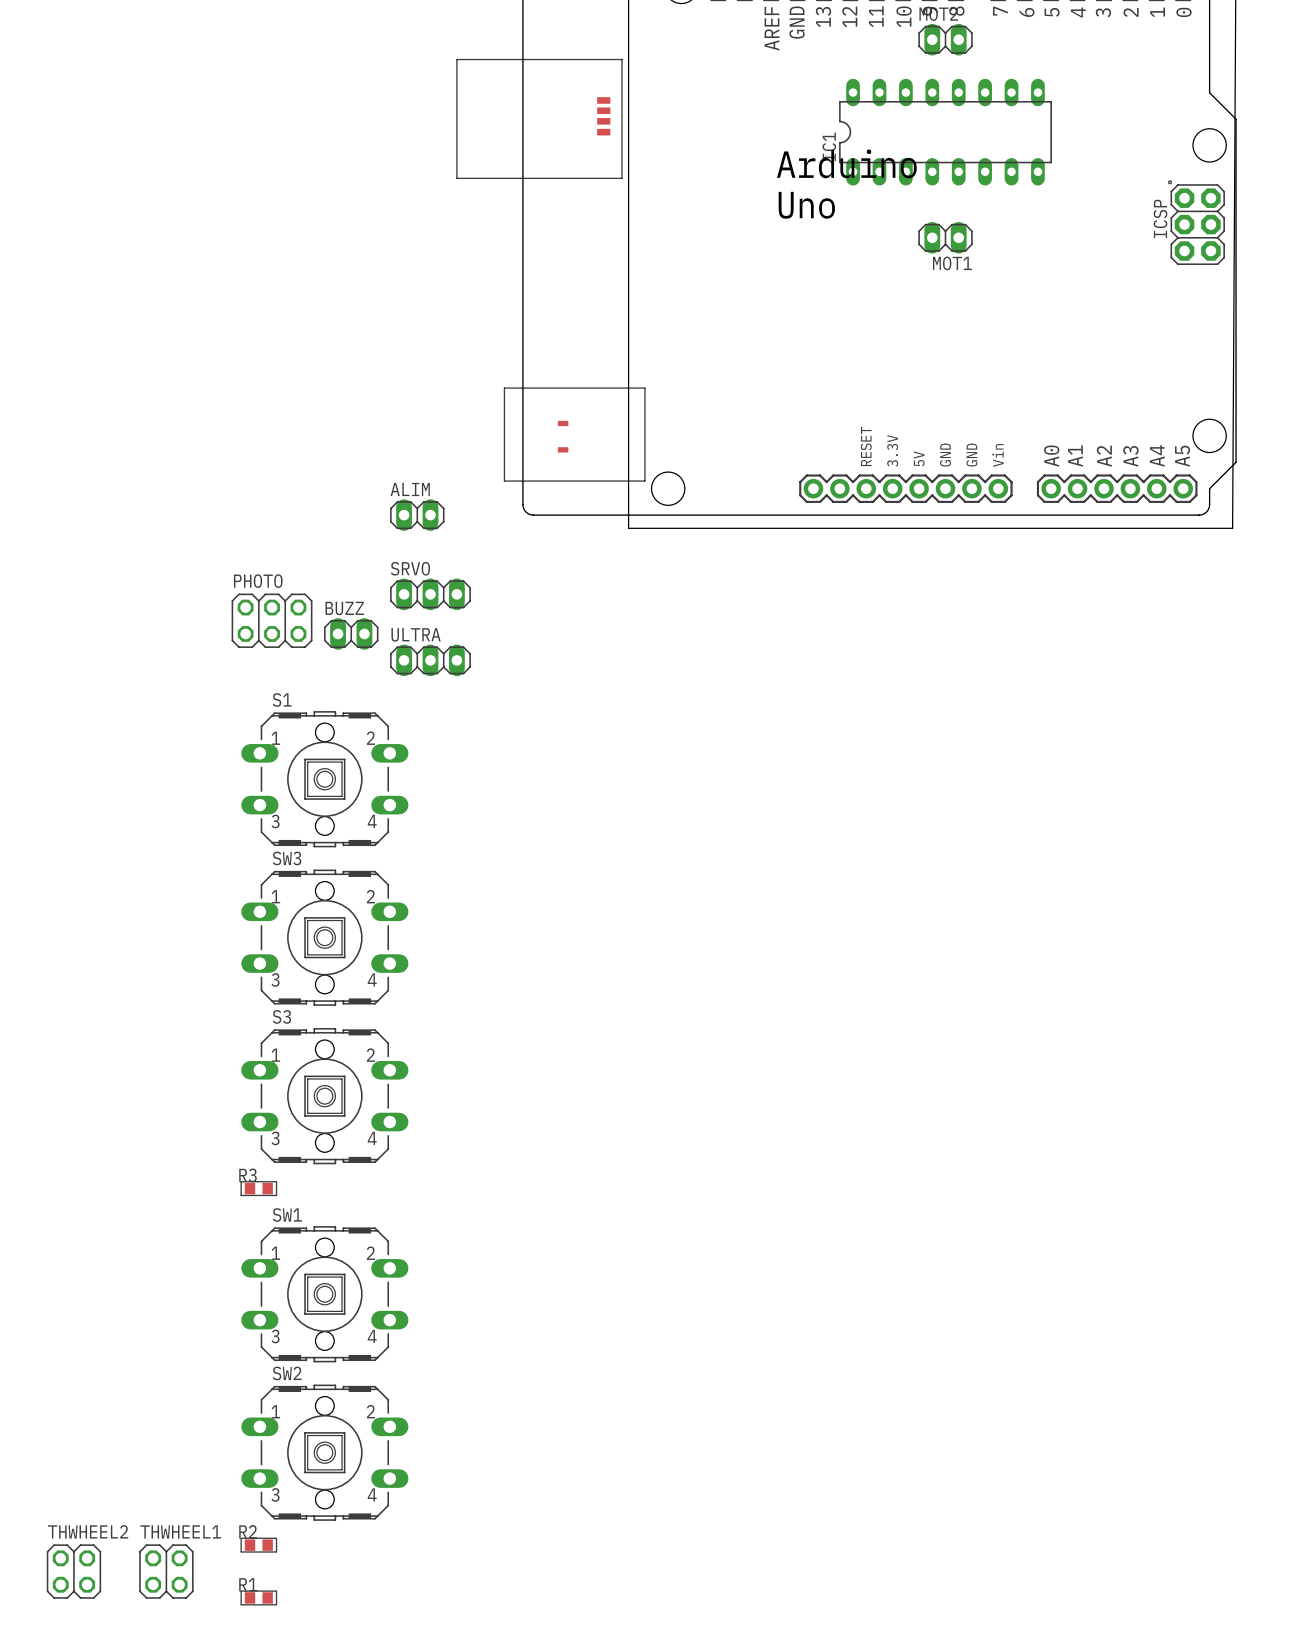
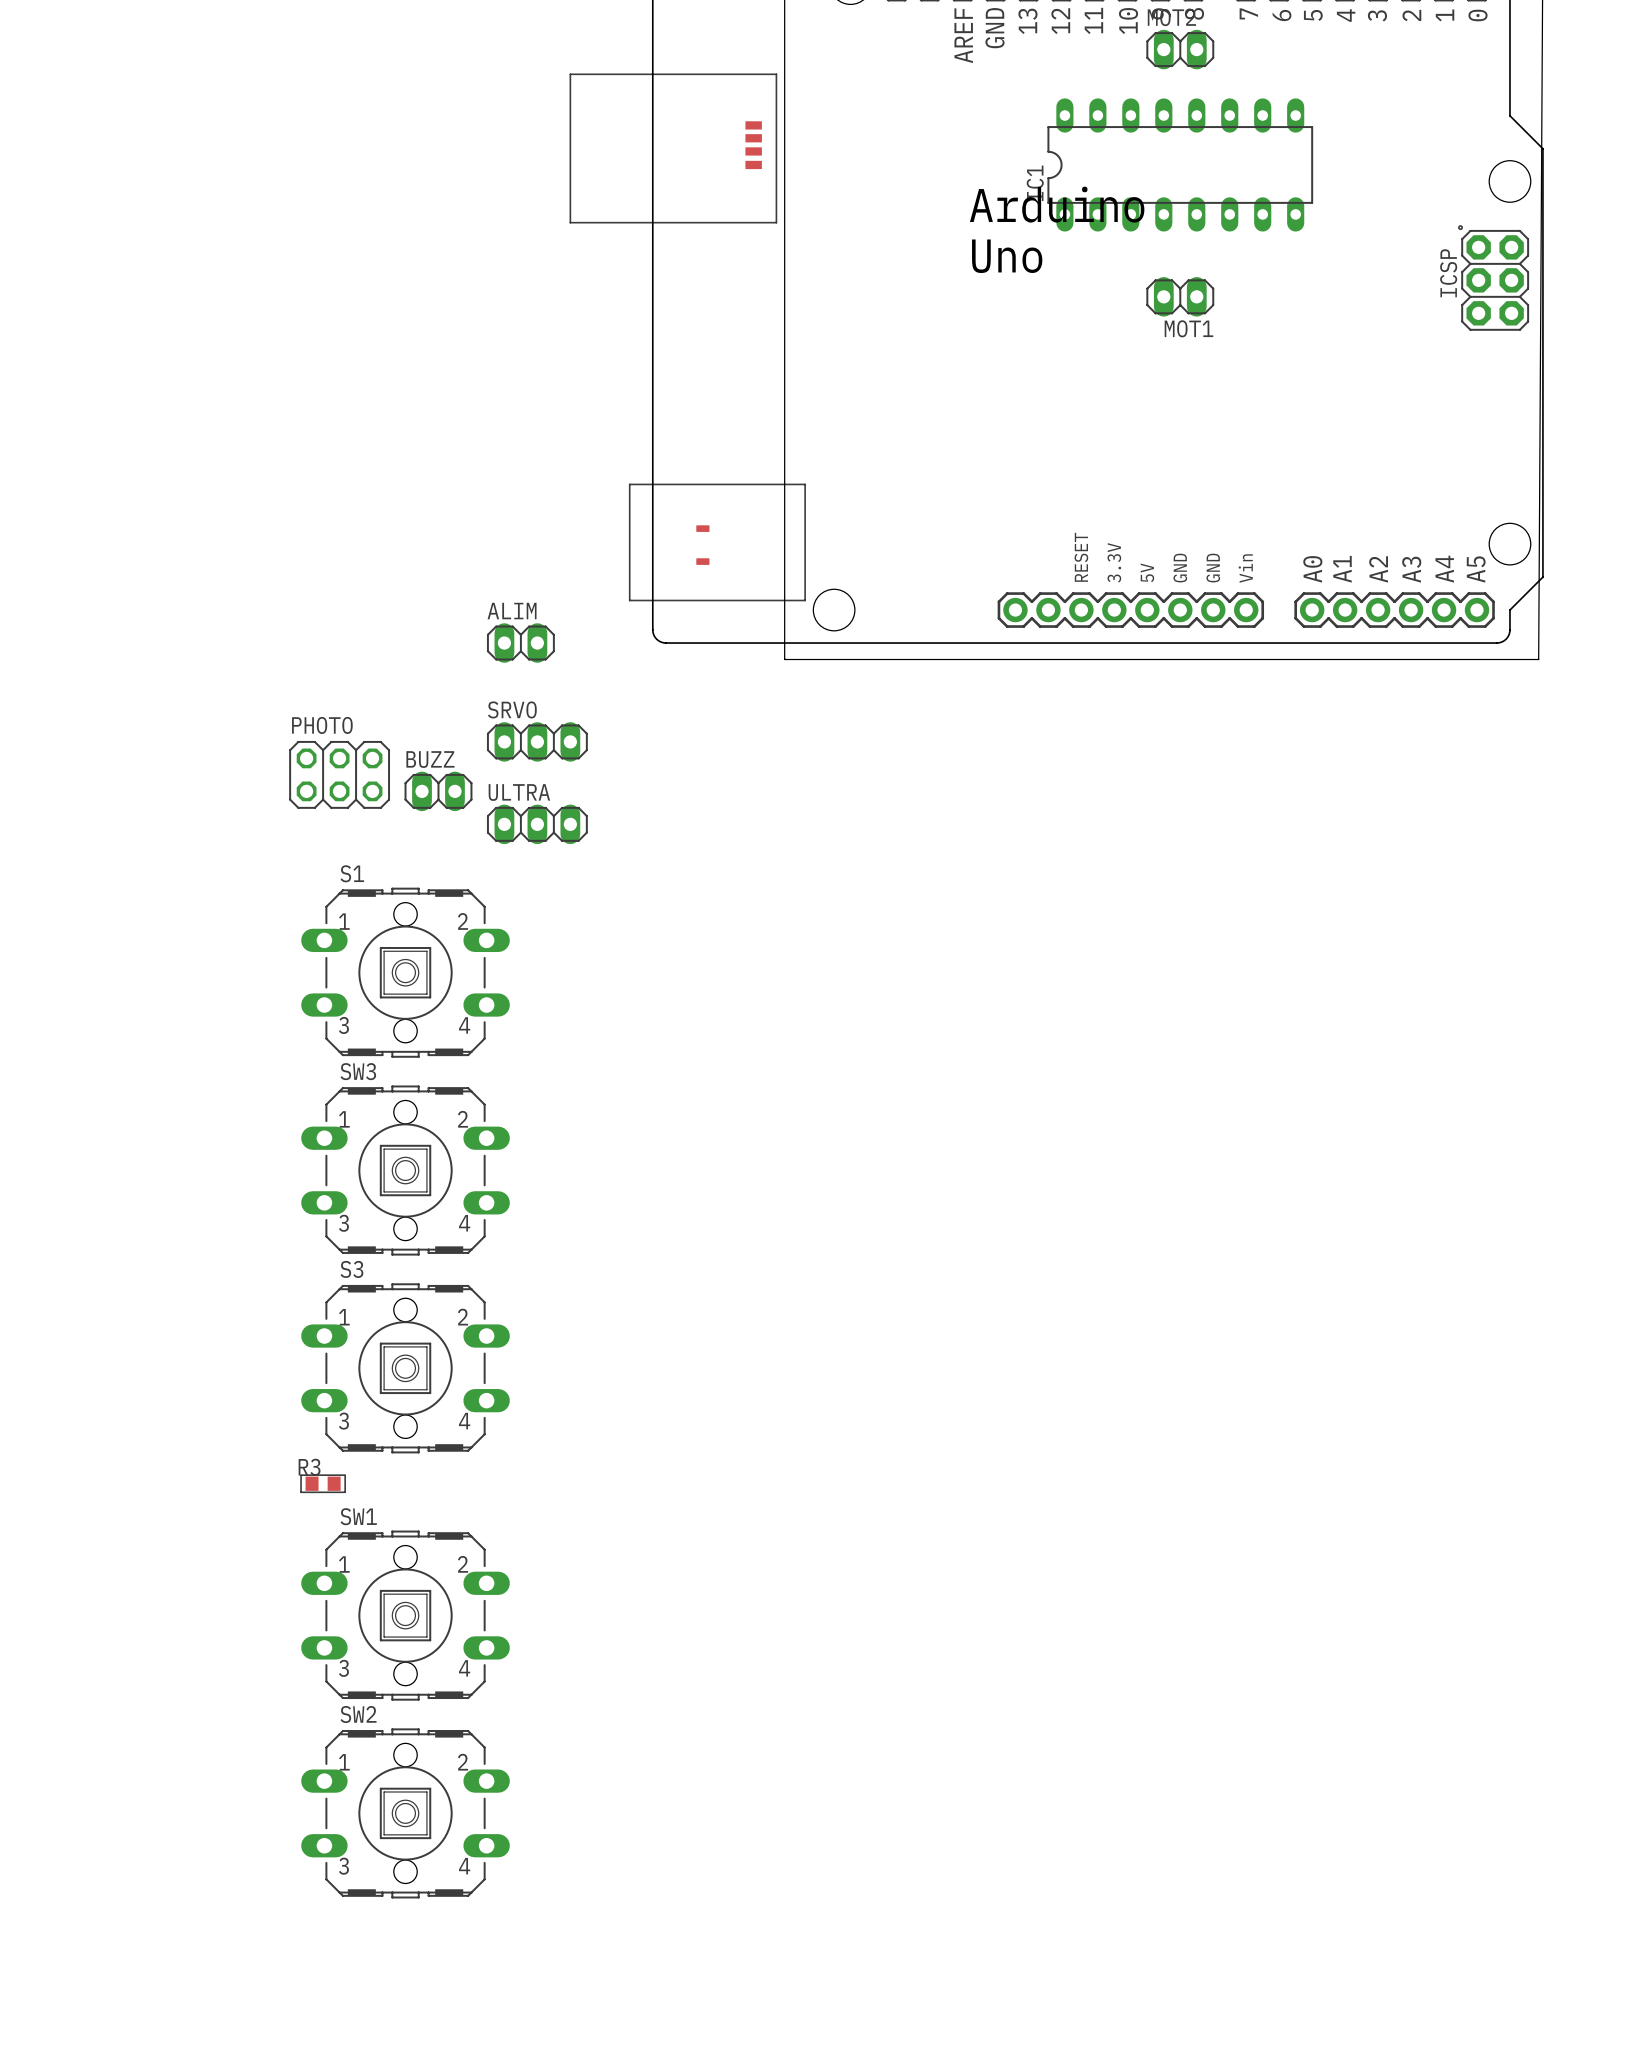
R2: (258, 1545) -> none
THWHEEL2: (73, 1571) -> none
THWHEEL1: (166, 1571) -> none
R1: (258, 1597) -> none

